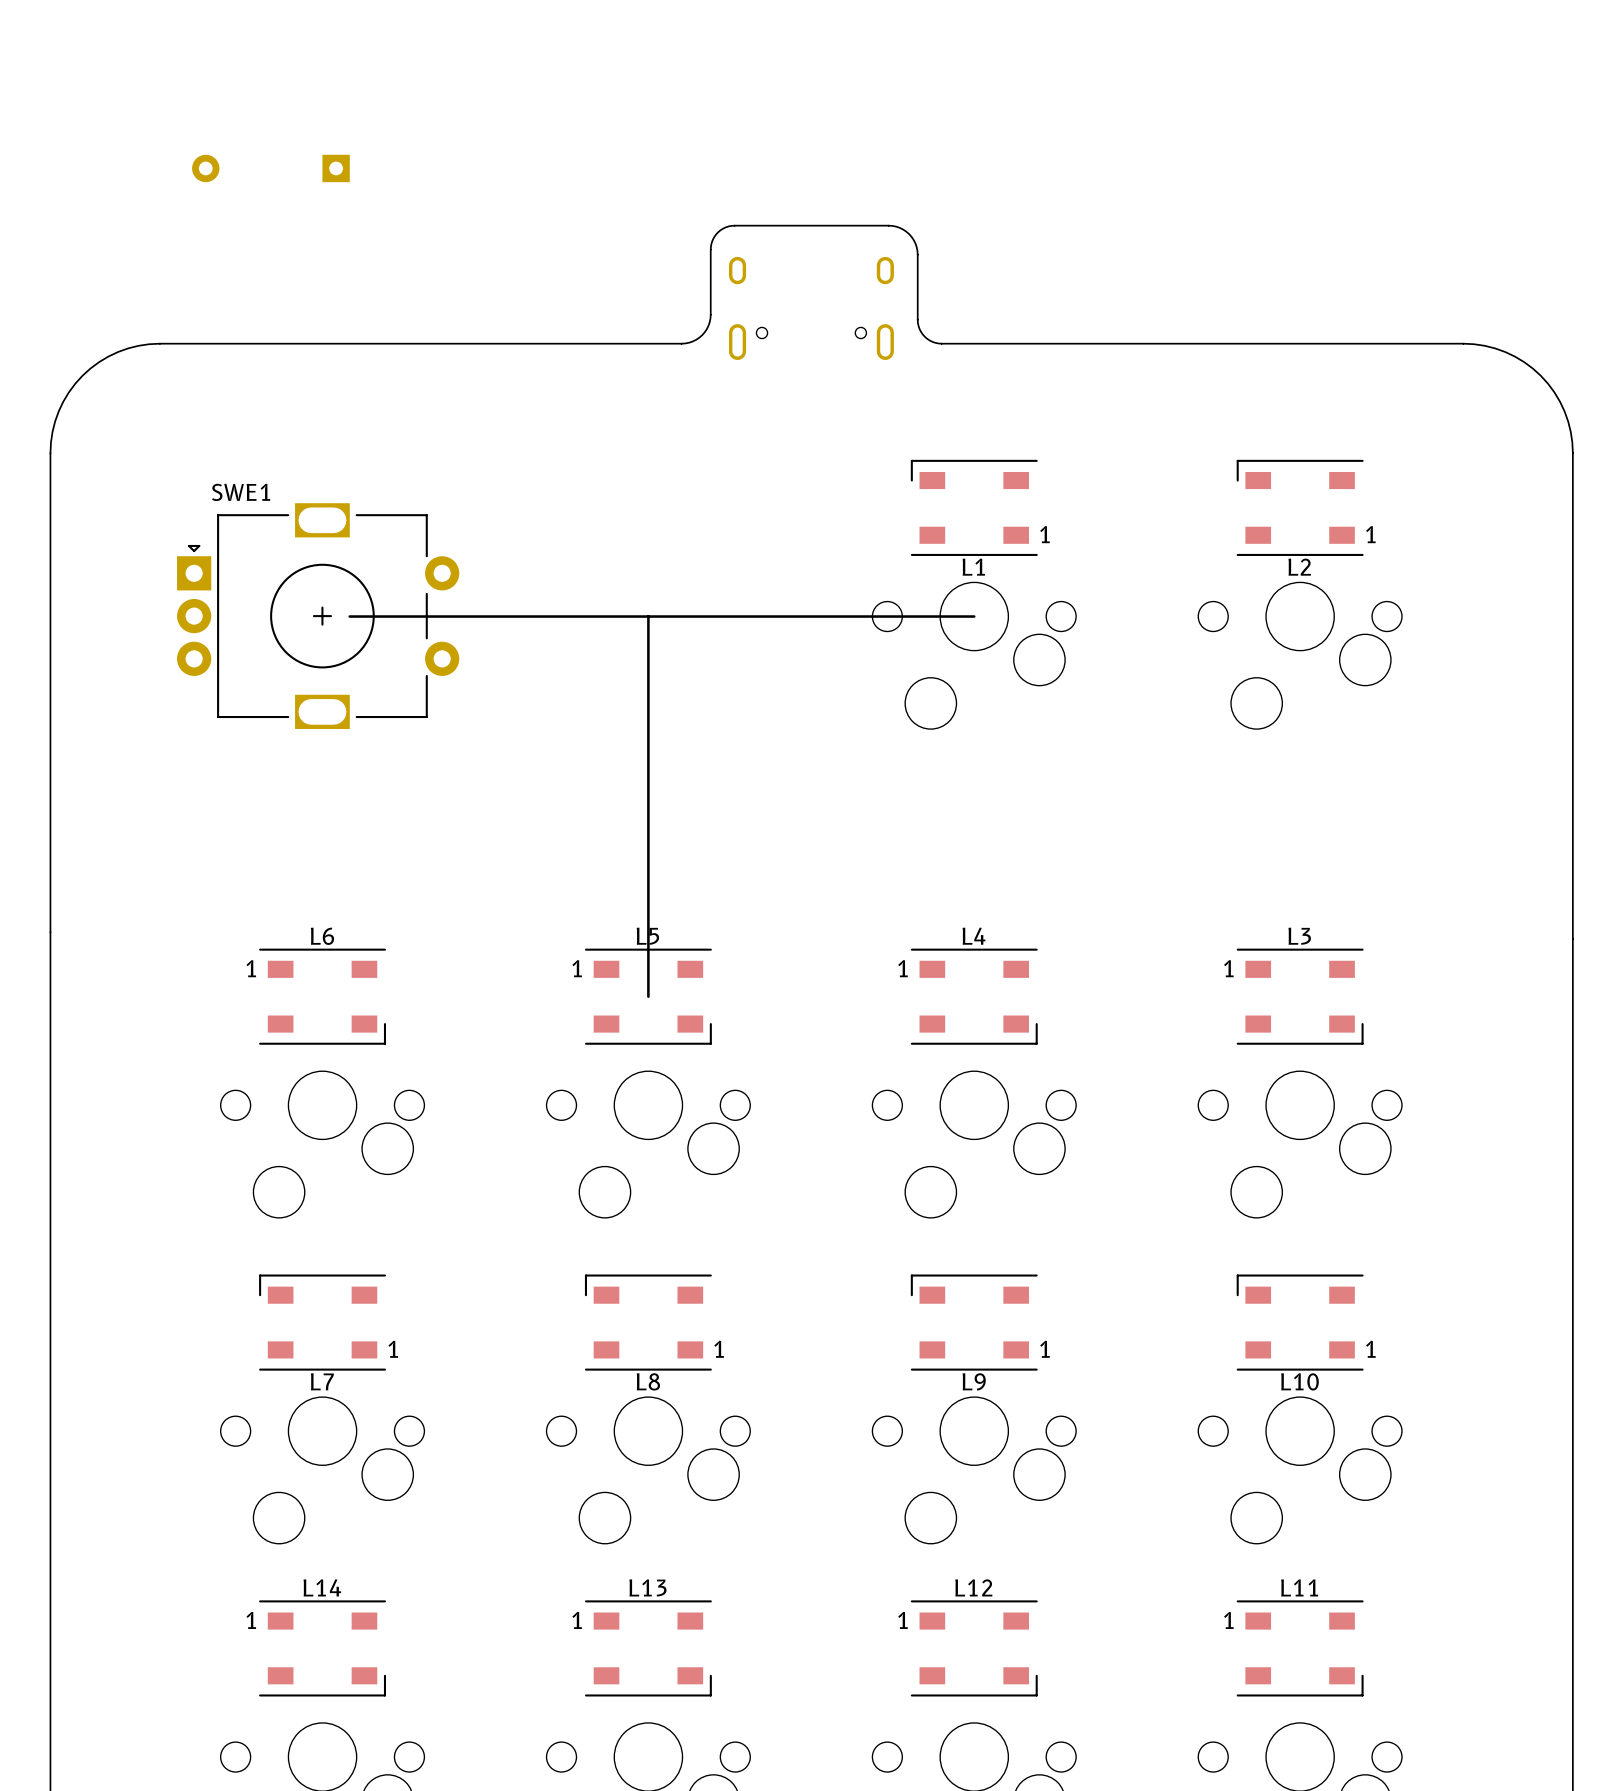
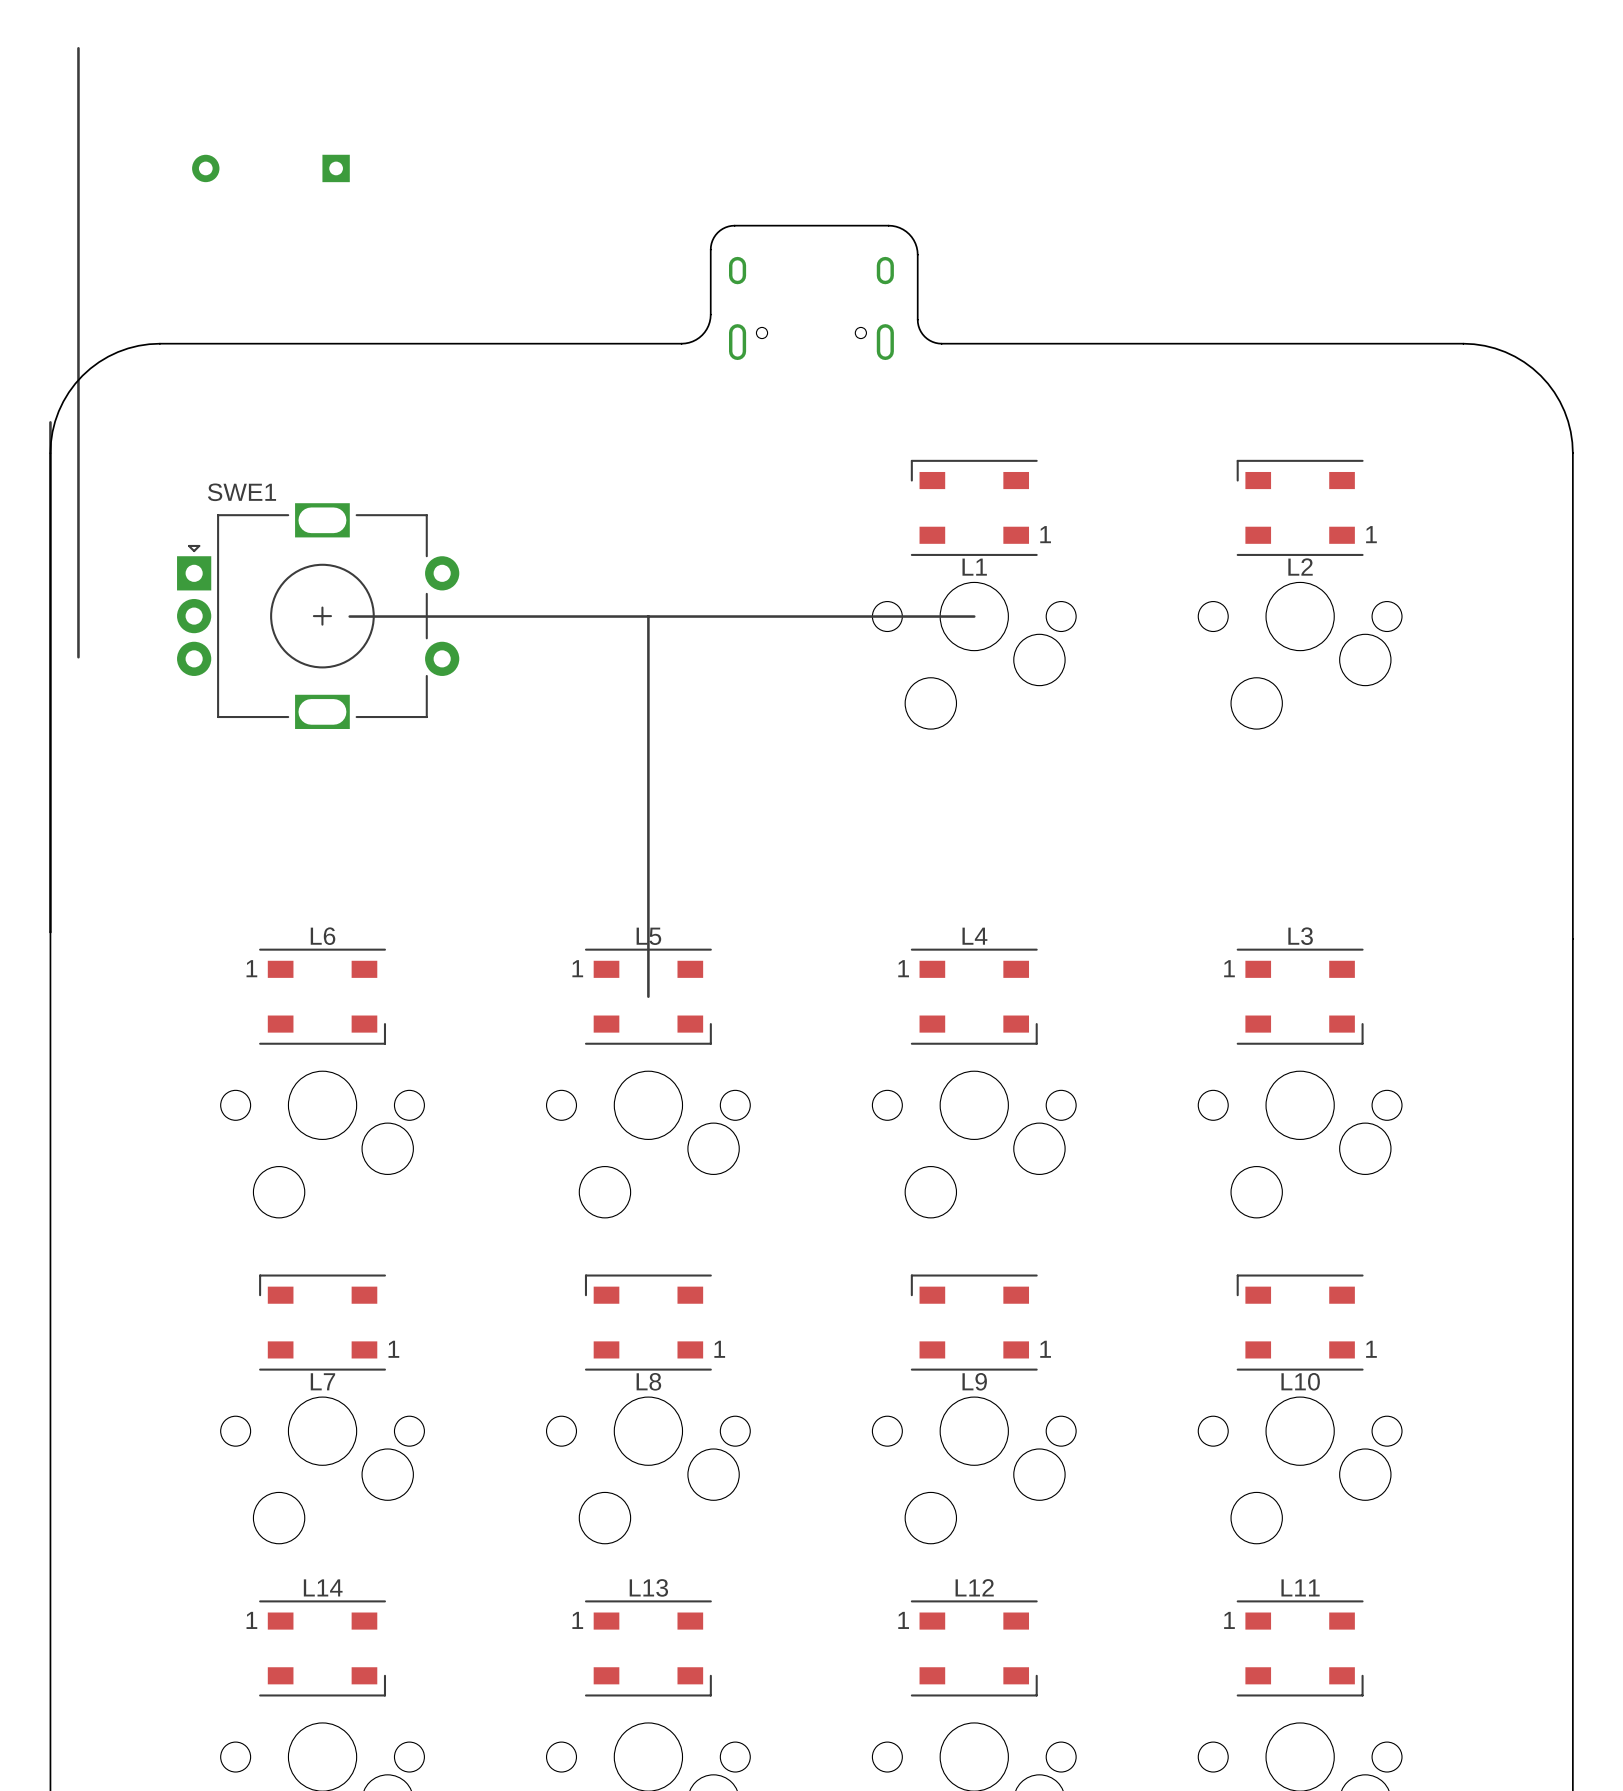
line: none -> (78, 48) (78, 657)
line: none -> (50, 422) (50, 932)

